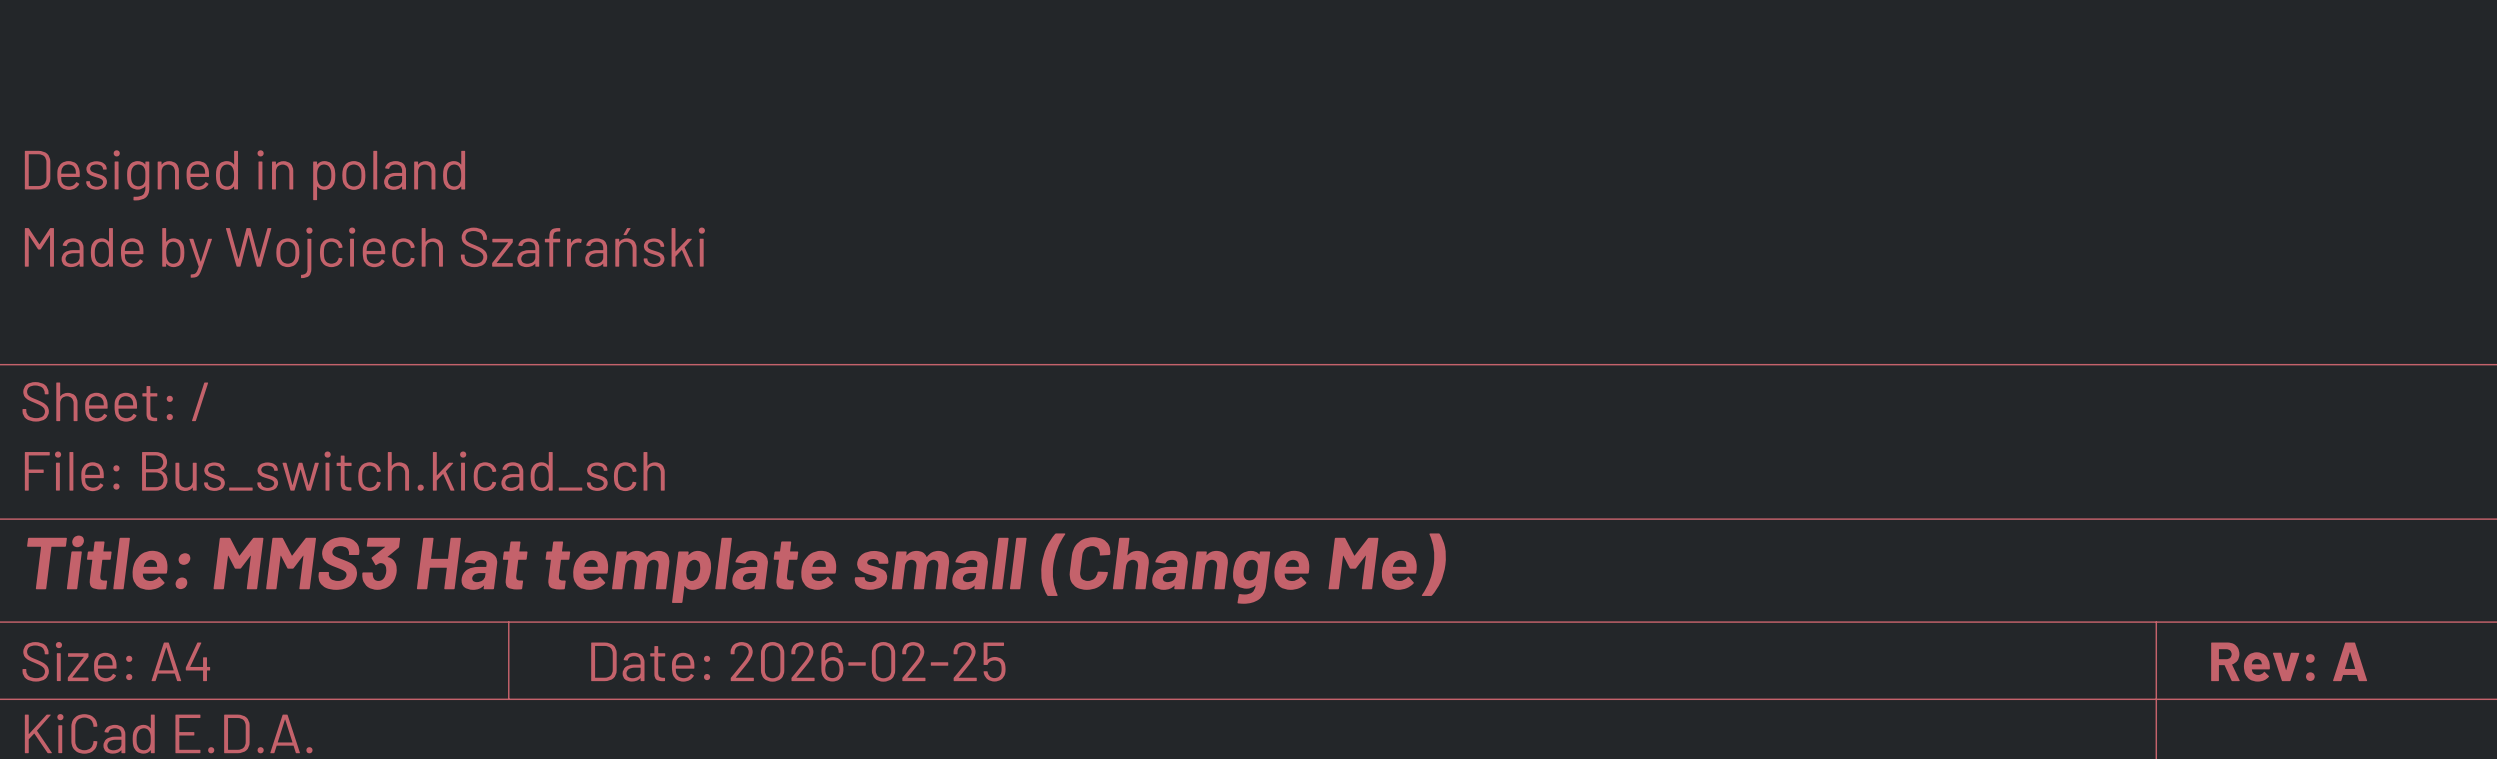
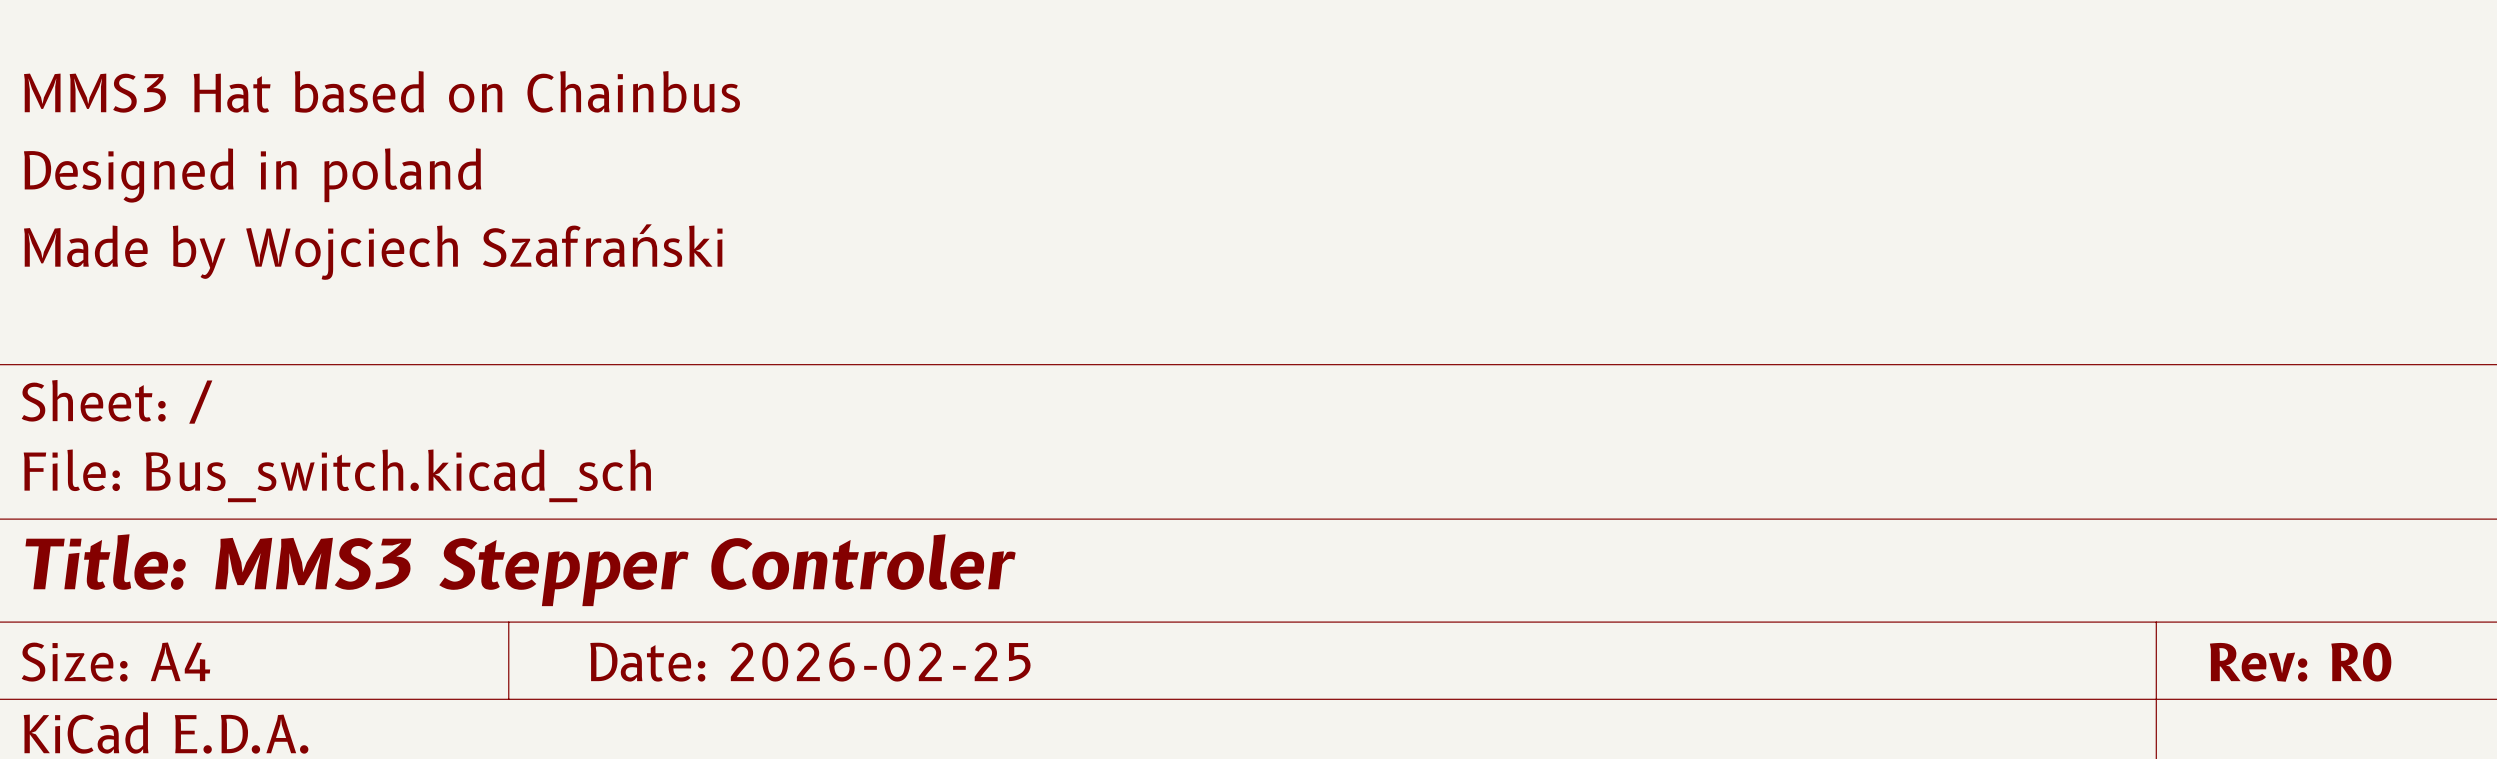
title block: none -> MMS3 Hat based on Chainbus (382, 91)
title block: Title: MMS3 Hat template small (Change Me) (736, 568) -> Title: MMS3 Stepper Controler (520, 570)
title block: Rev: A (2289, 662) -> Rev: R0 (2300, 662)

